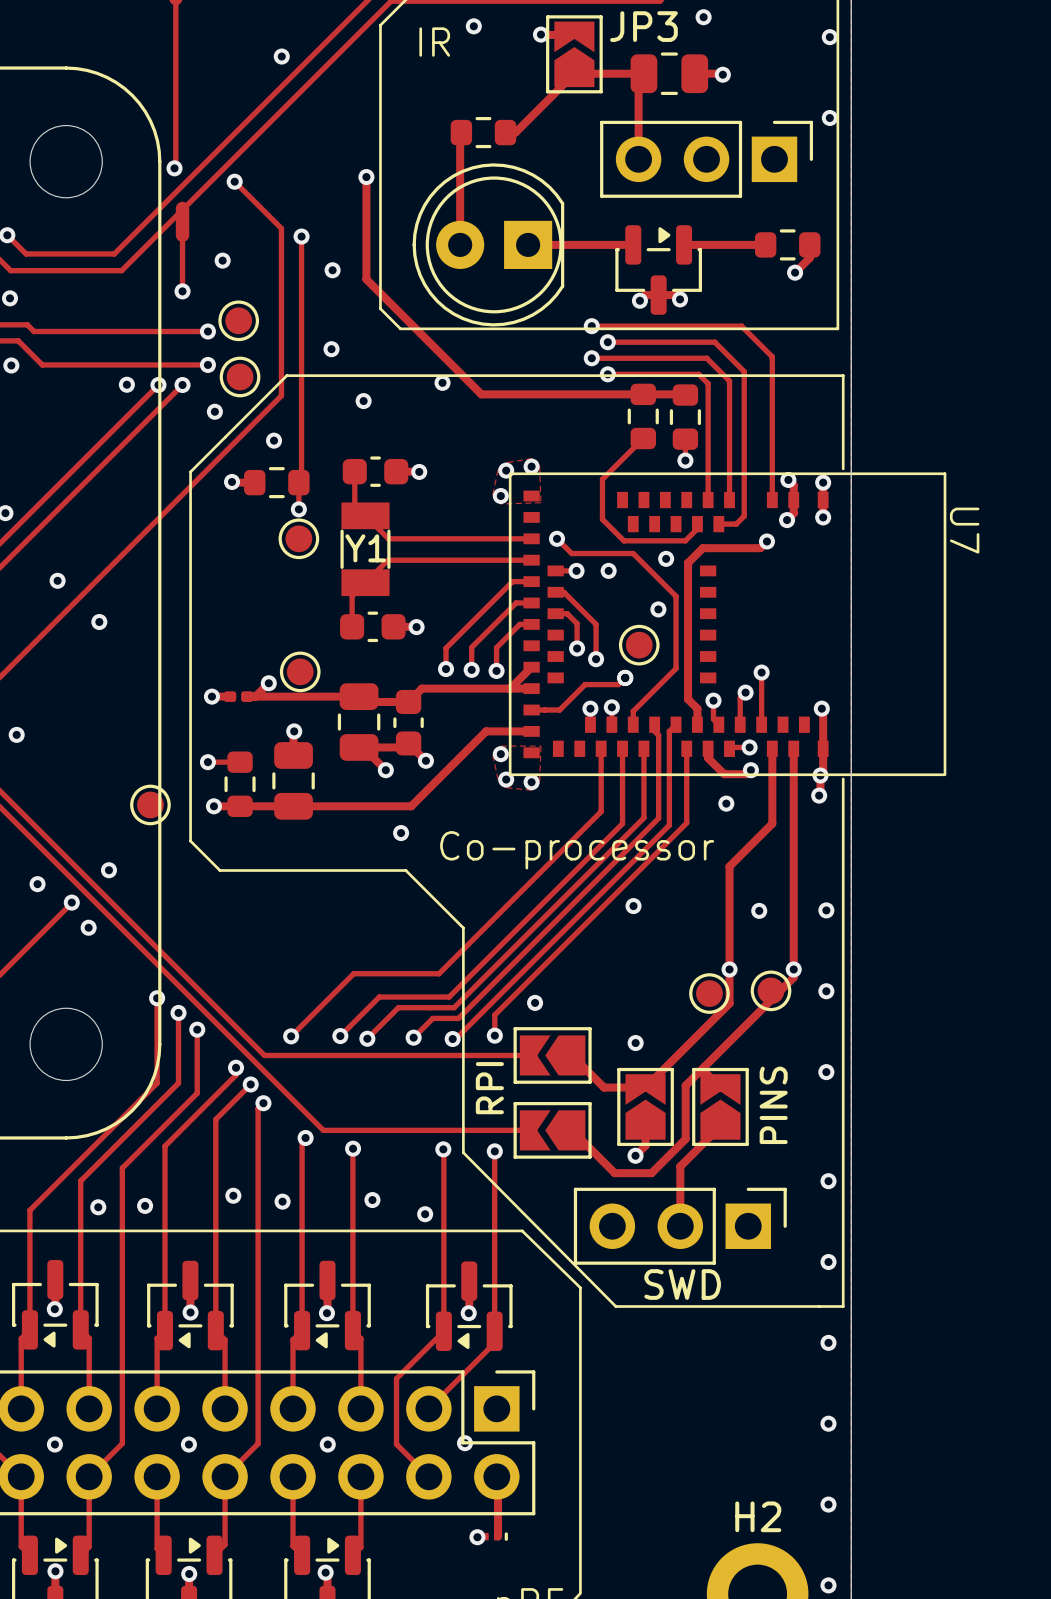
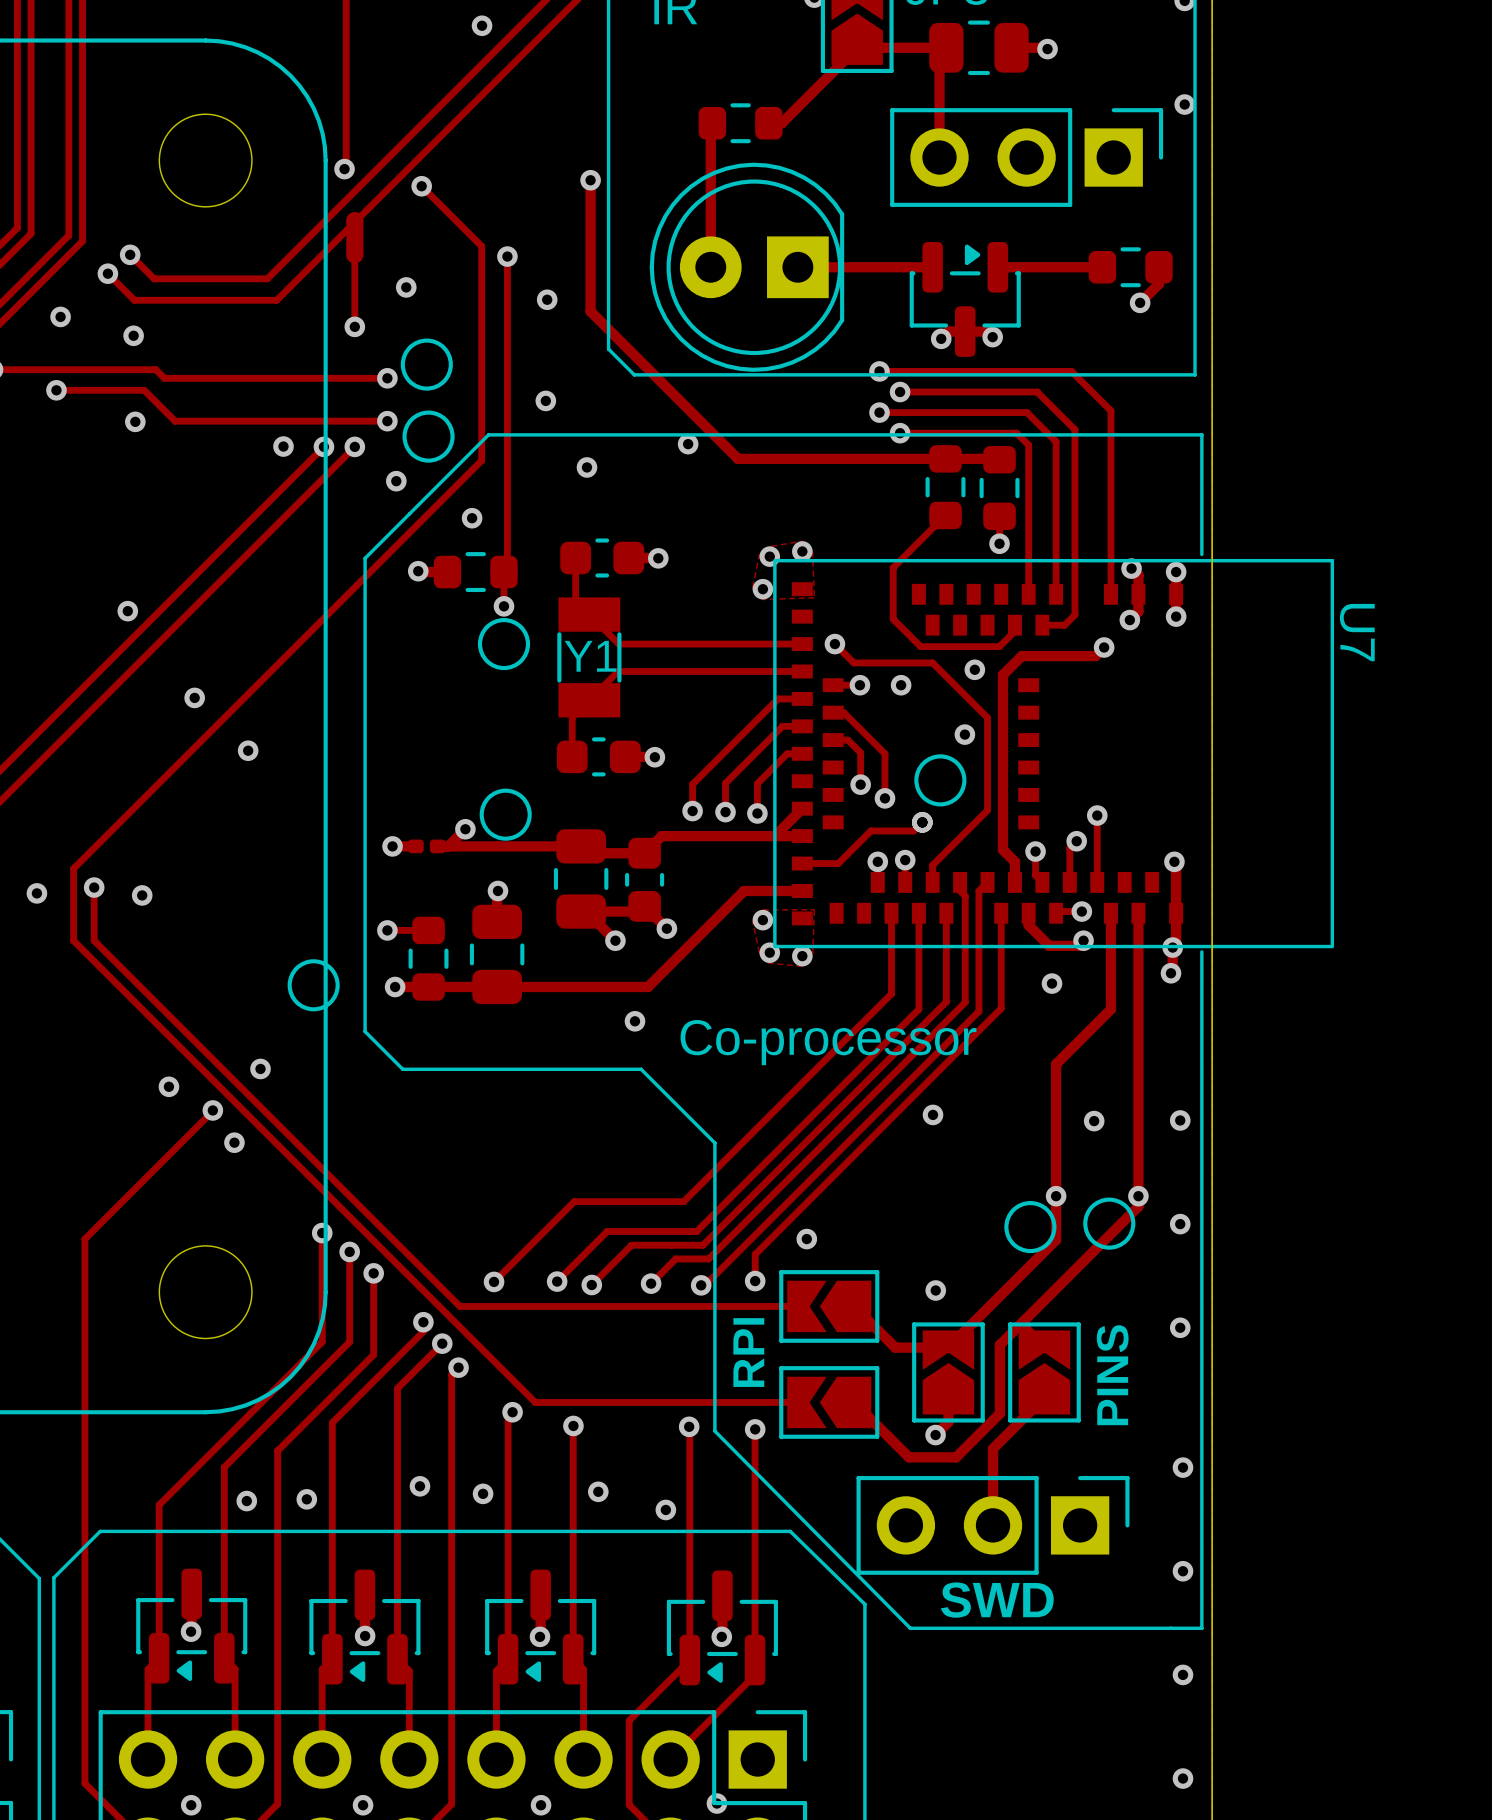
part footprint: [218, 300, 260, 342] -> [400, 338, 453, 391]
part footprint: [219, 356, 261, 398] -> [402, 410, 455, 463]
part footprint: [278, 518, 320, 560] -> [477, 618, 531, 671]
part footprint: [618, 624, 660, 666] -> [914, 754, 967, 807]
part footprint: [279, 651, 321, 693] -> [479, 788, 532, 841]
part footprint: [130, 784, 171, 826] -> [287, 959, 340, 1012]
part footprint: [750, 970, 792, 1012] -> [1083, 1197, 1136, 1250]
part footprint: [689, 973, 730, 1014] -> [1004, 1200, 1057, 1254]

